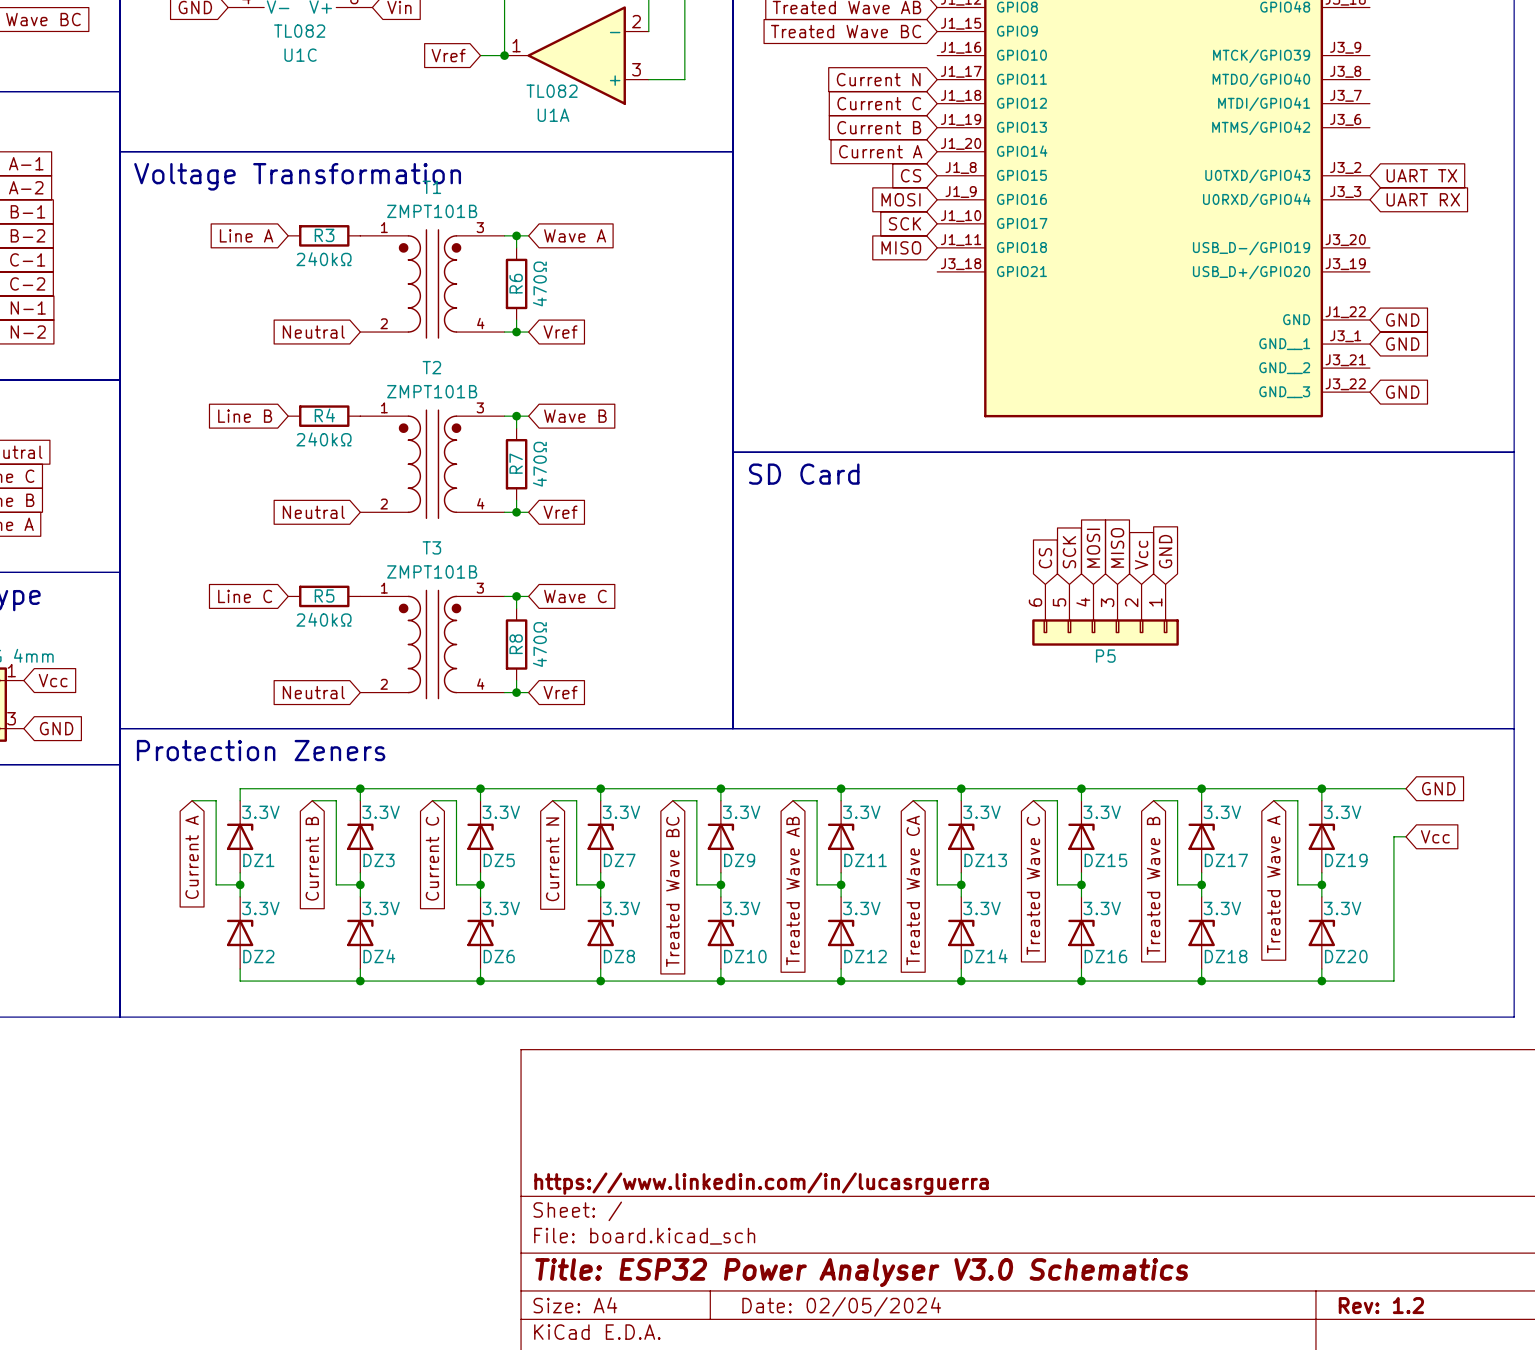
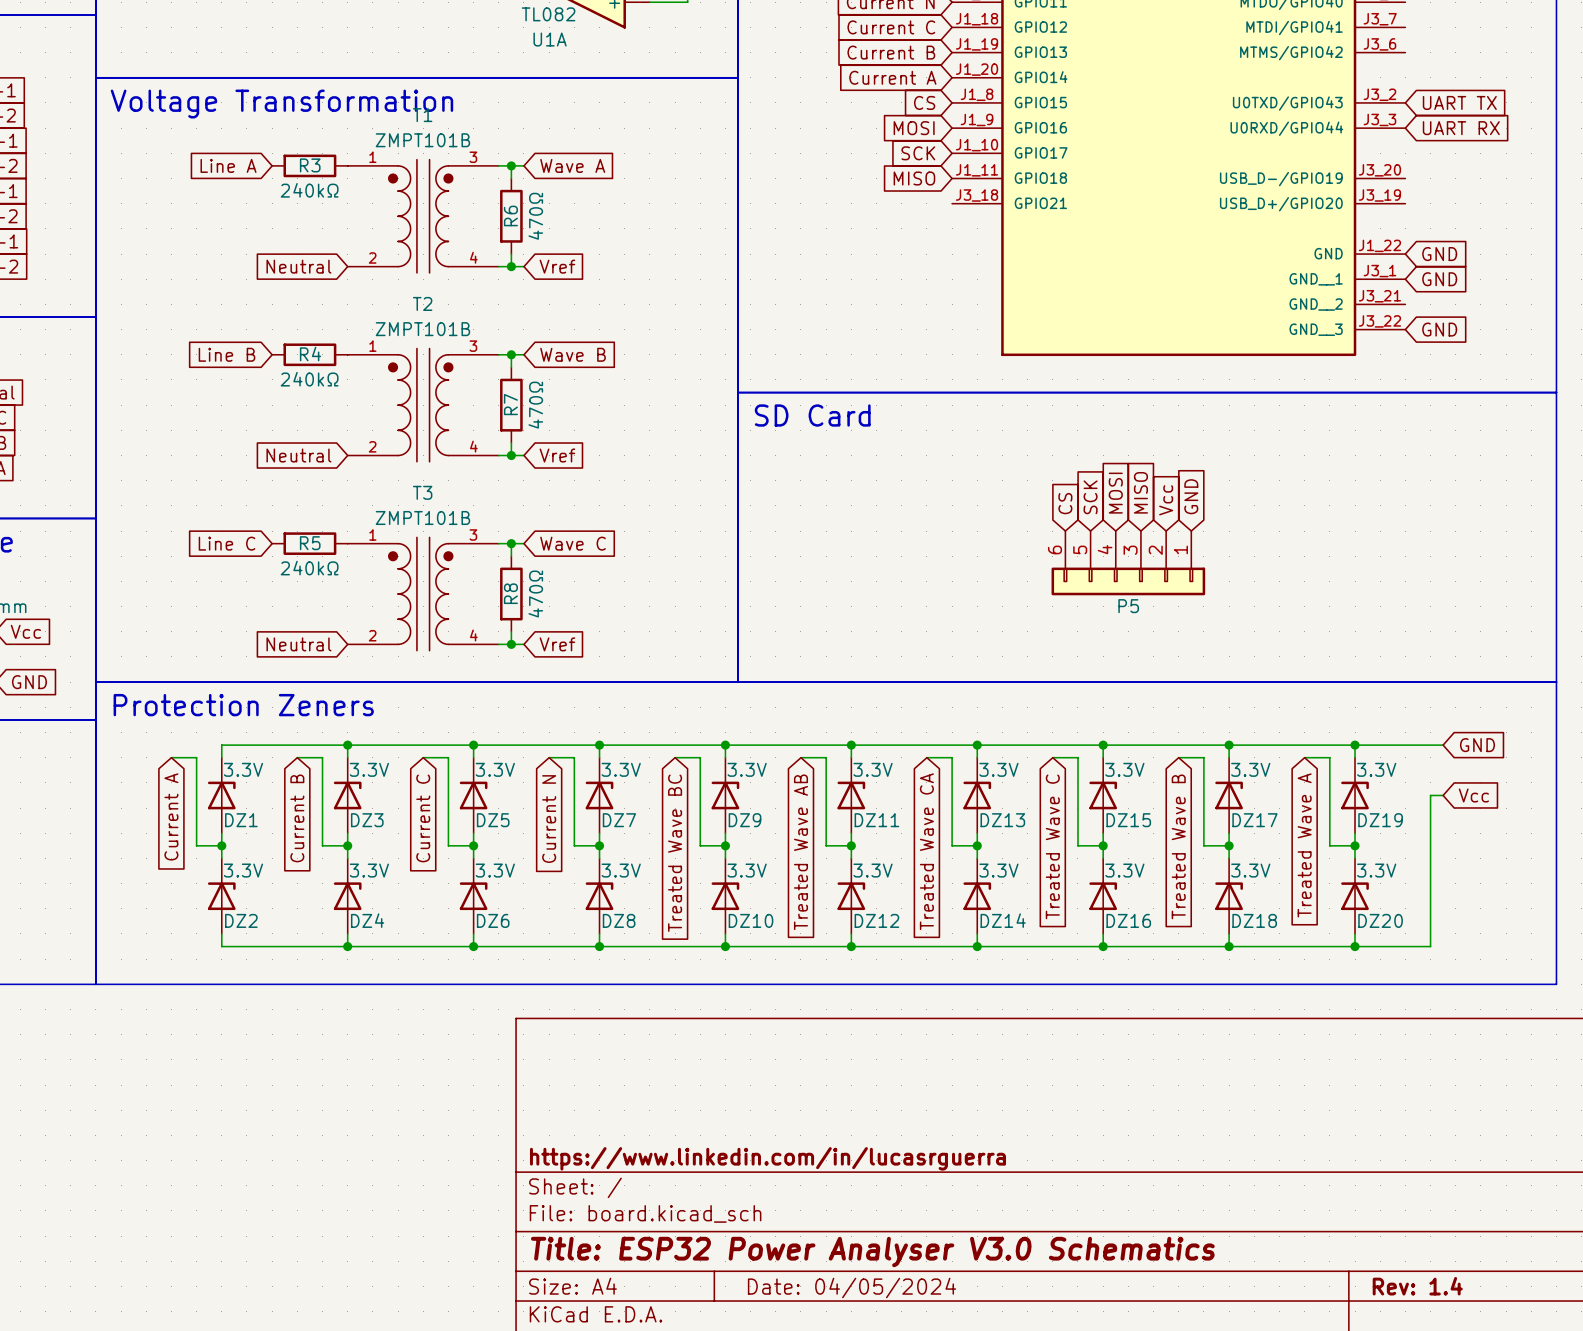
title block: Rev: 1.2 (1381, 1305) -> Rev: 1.4 (1417, 1286)
title block: Date: 02/05/2024 (841, 1306) -> Date: 04/05/2024 (852, 1287)

